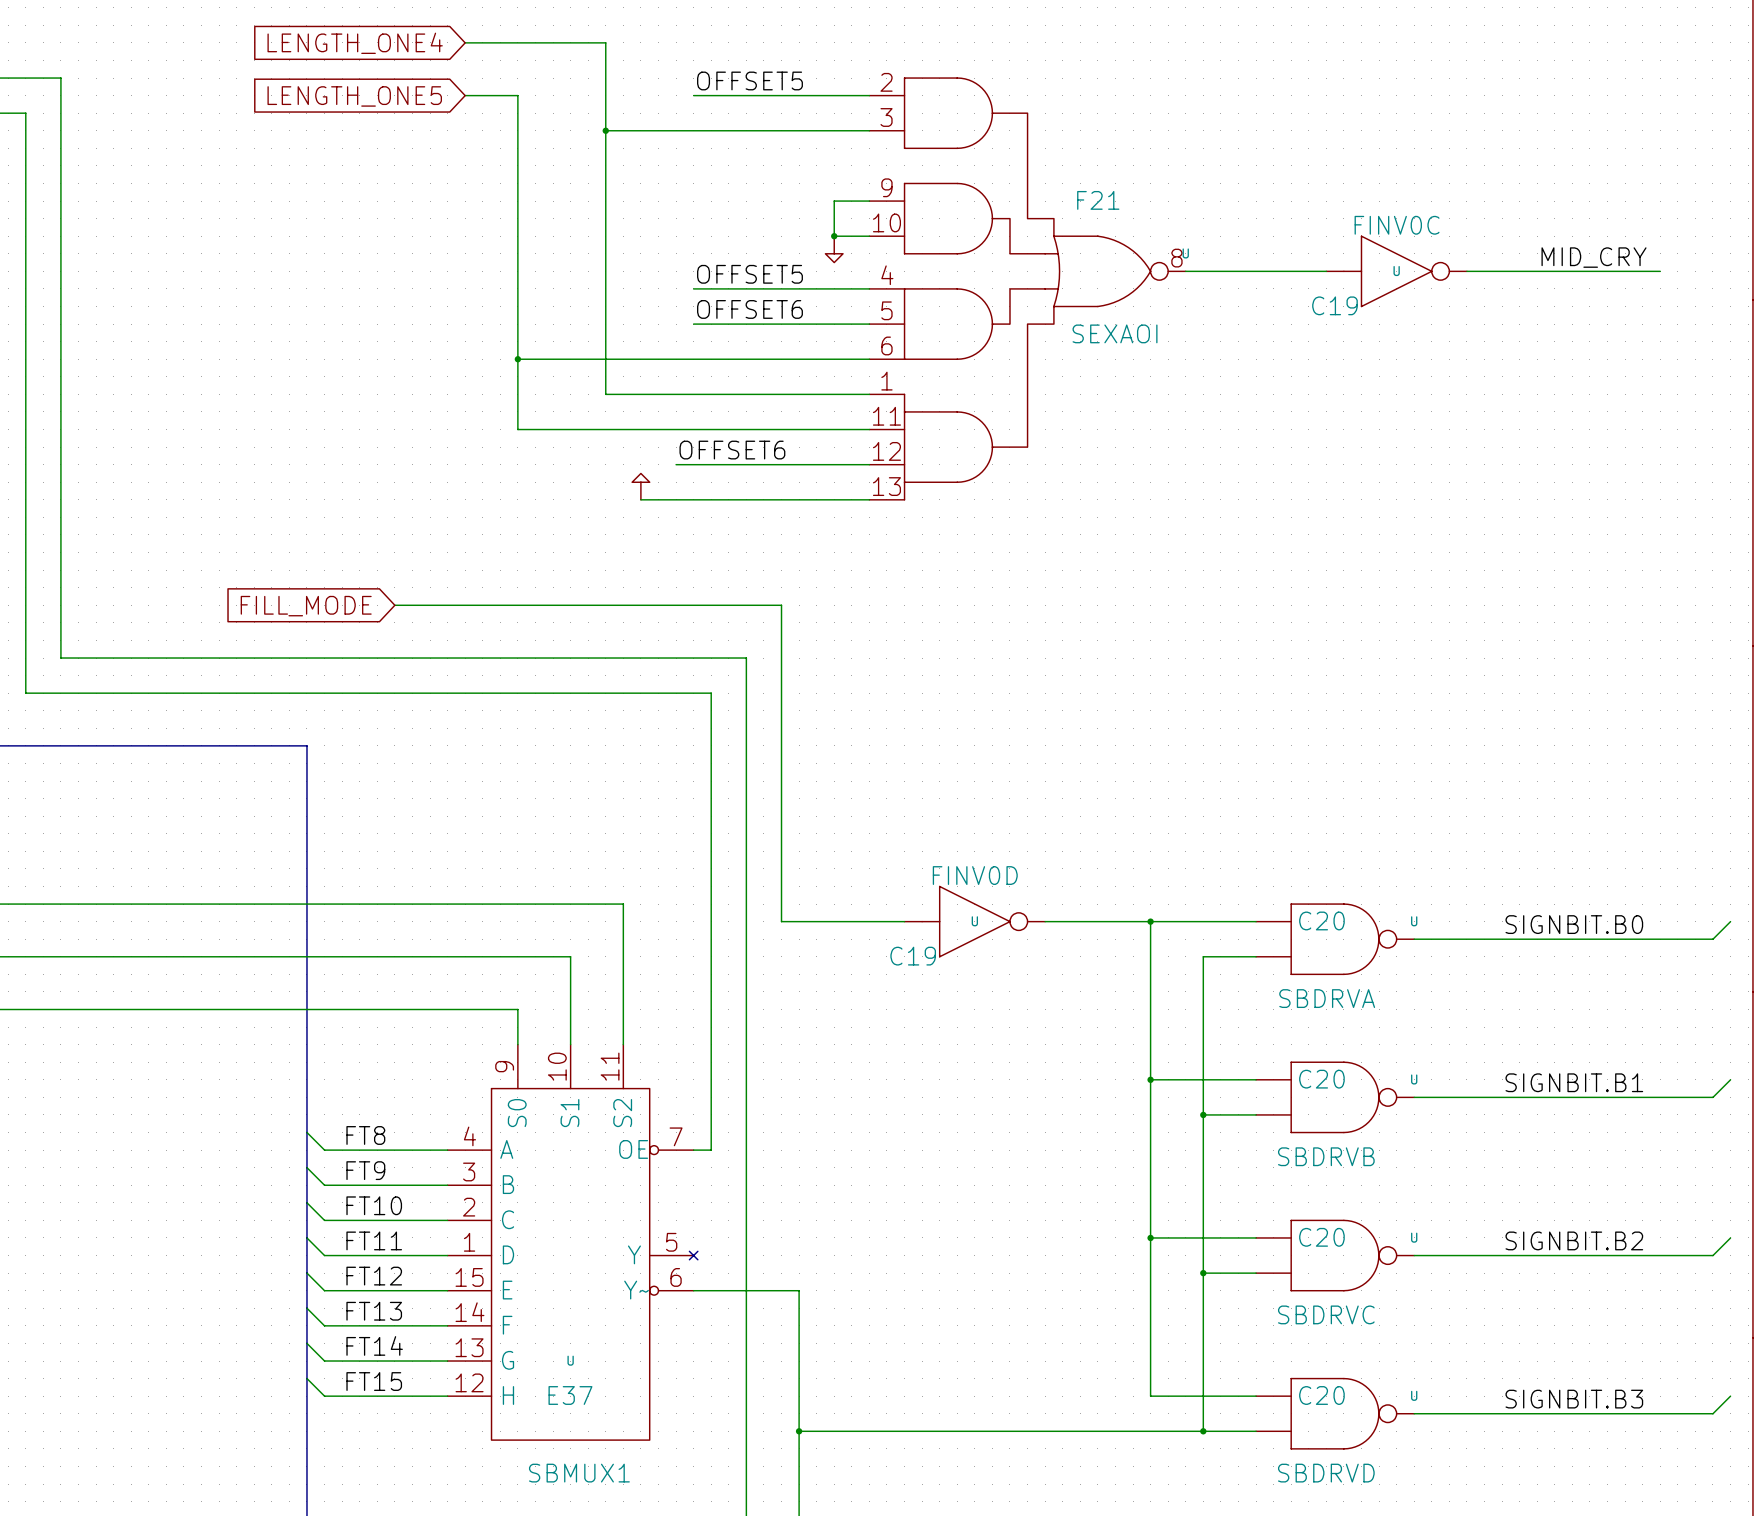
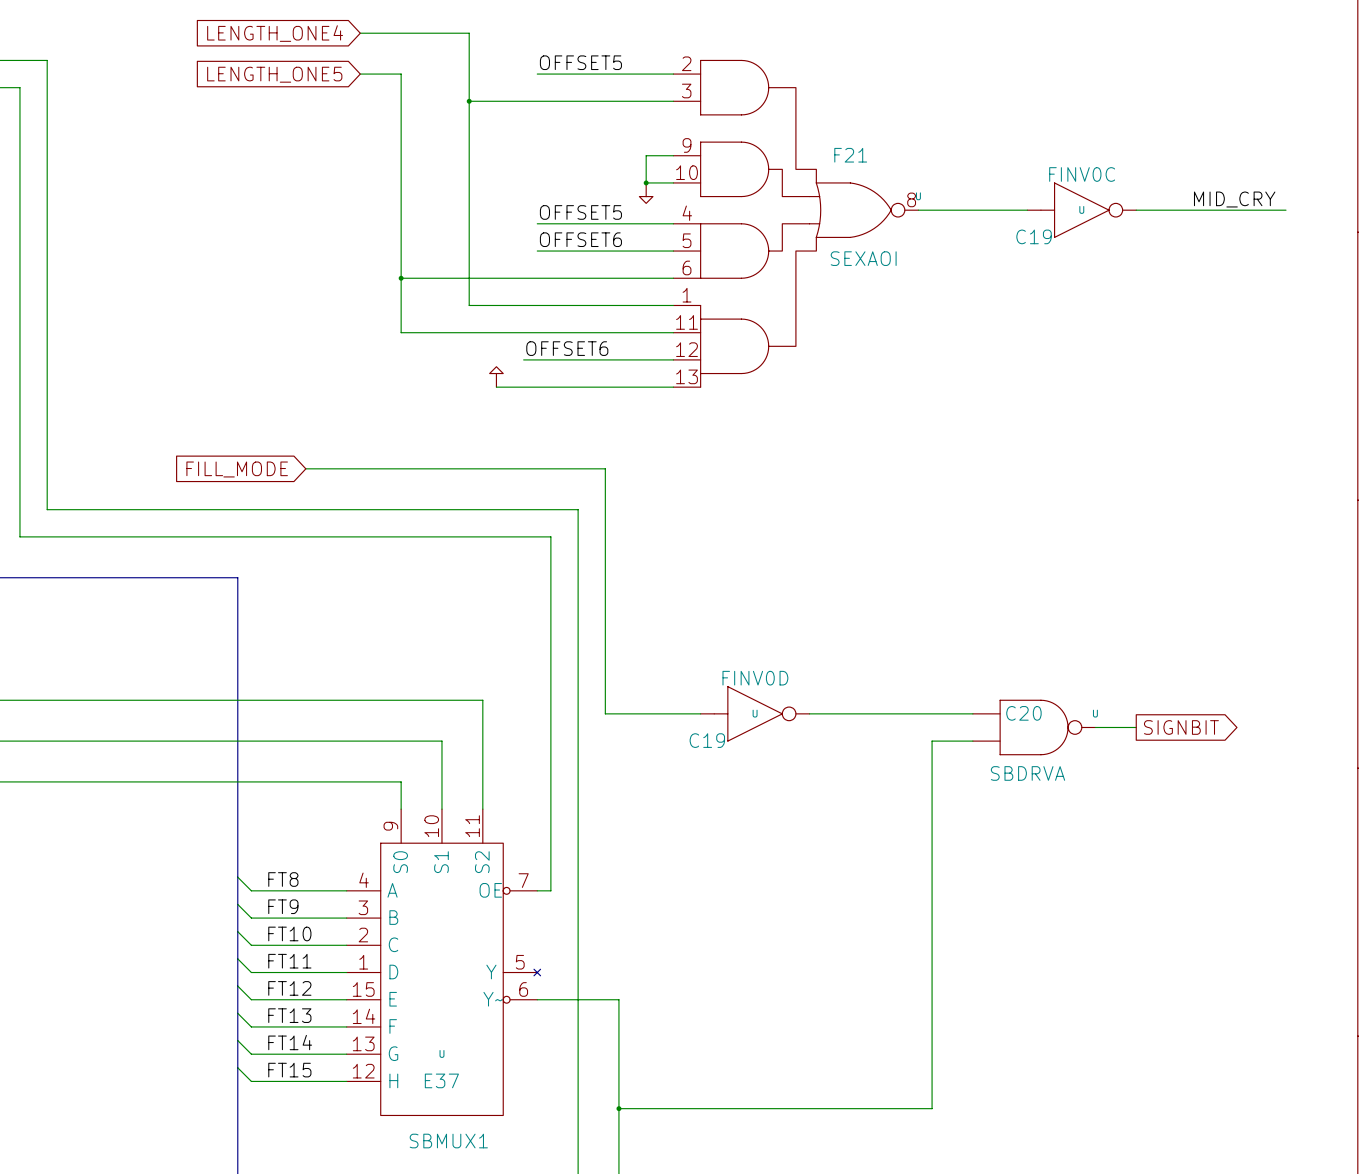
wire: (1150, 921) (1150, 1396) (1256, 1396) -> none
junction: (1150, 921) -> none
wire: (1730, 921) (1712, 939) (1466, 939) -> none
label: SIGNBIT.B0 (1574, 924) -> none
global label: none -> SIGNBIT (1181, 727)
wire: (1150, 1079) (1256, 1079) -> none
junction: (1150, 1079) -> none
wire: (1730, 1079) (1712, 1097) (1414, 1097) -> none
label: SIGNBIT.B1 (1574, 1082) -> none
U: (1335, 1097) -> none
wire: (1203, 1114) (1256, 1114) -> none
junction: (1203, 1114) -> none
wire: (1150, 1237) (1256, 1237) -> none
junction: (1150, 1237) -> none
wire: (1730, 1237) (1712, 1255) (1414, 1255) -> none
label: SIGNBIT.B2 (1574, 1240) -> none
U: (1335, 1255) -> none
wire: (1203, 1273) (1256, 1273) -> none
junction: (1203, 1273) -> none
wire: (1730, 1396) (1712, 1413) (1414, 1413) -> none
label: SIGNBIT.B3 (1574, 1399) -> none
U: (1335, 1413) -> none
wire: (1203, 1431) (1256, 1431) -> none
junction: (1203, 1431) -> none

